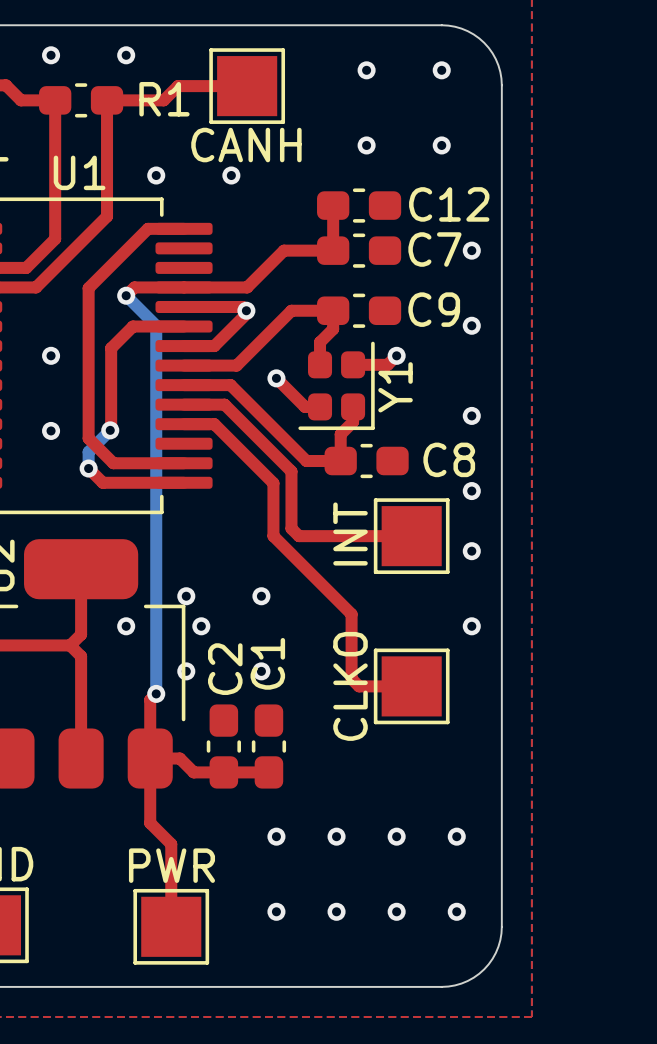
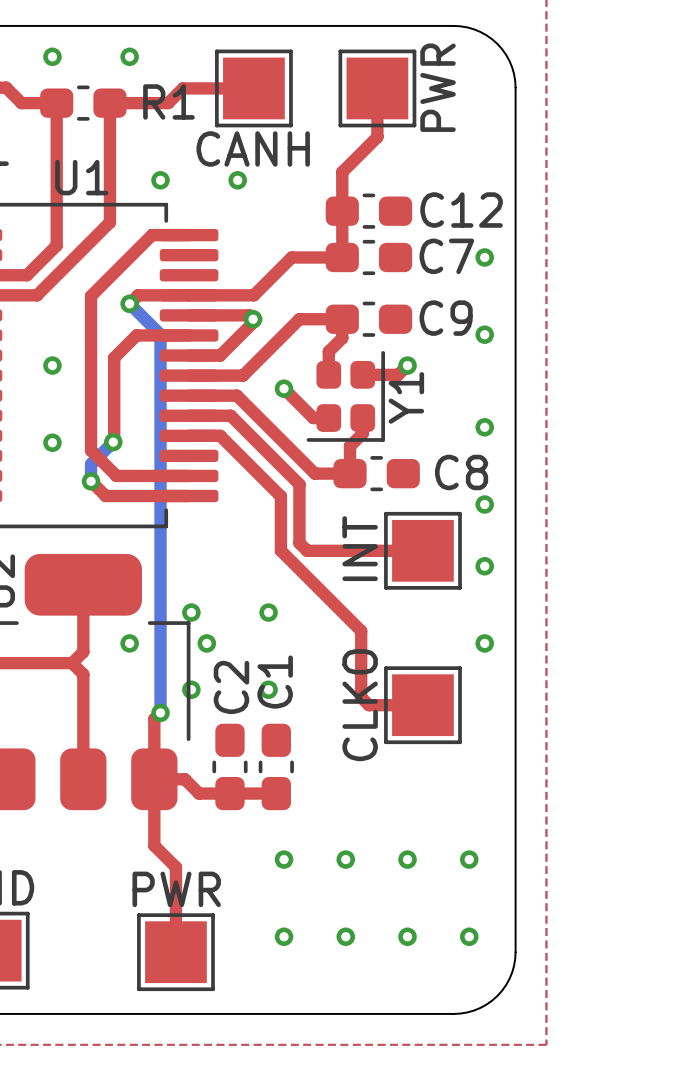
via: (366, 70) -> none
via: (441, 70) -> none
top track: none -> (377, 88) (377, 137) (342, 172) (342, 211)
part: none -> (377, 88)
via: (366, 145) -> none
via: (441, 145) -> none

